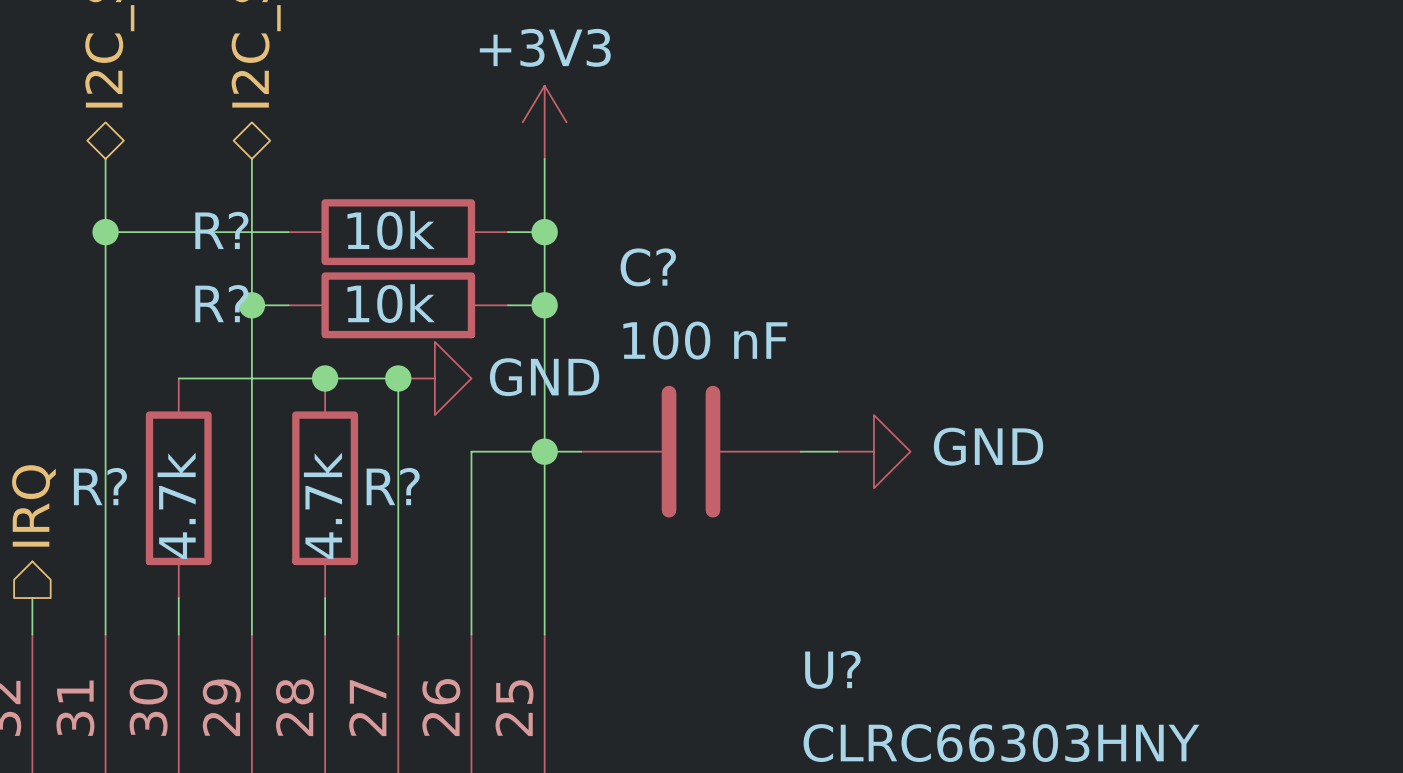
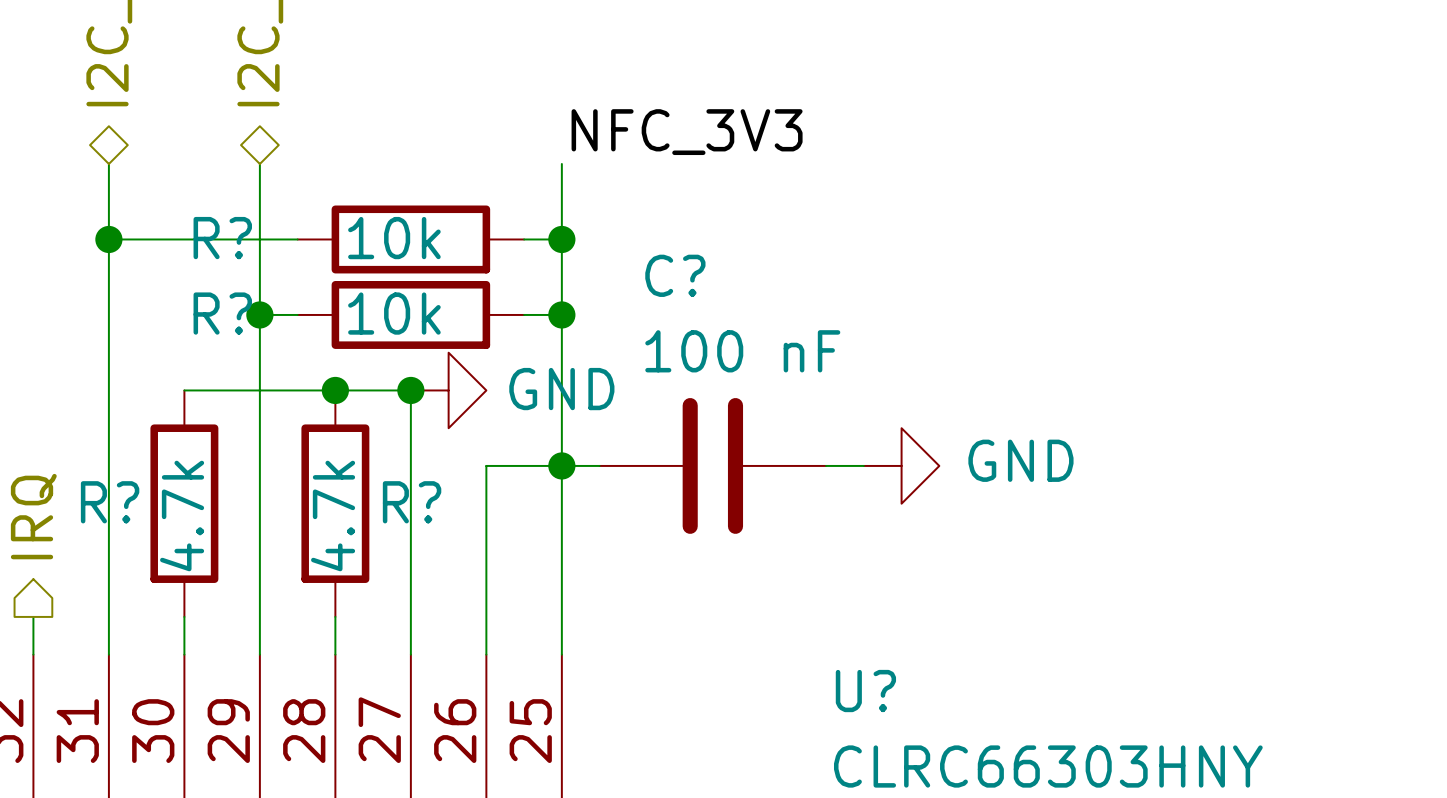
power symbol: +3V3 (544, 122) -> none
label: none -> NFC_3V3 (687, 132)

